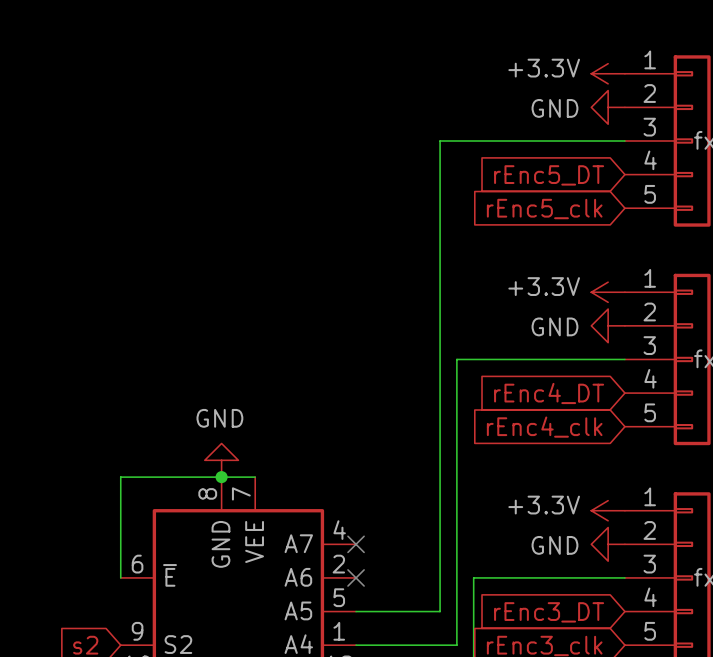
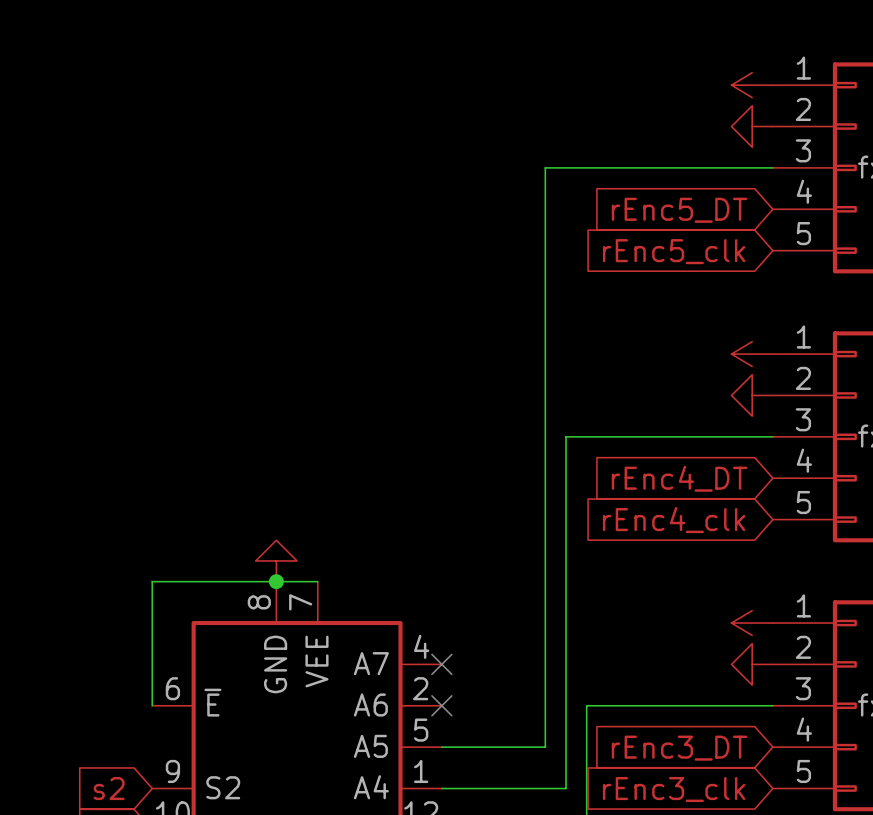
power symbol text: +3.3V (544, 68) -> none
power symbol text: GND (554, 108) -> none
power symbol text: +3.3V (544, 286) -> none
power symbol text: GND (554, 326) -> none
power symbol text: GND (219, 418) -> none
power symbol text: +3.3V (544, 505) -> none
power symbol text: GND (554, 545) -> none

